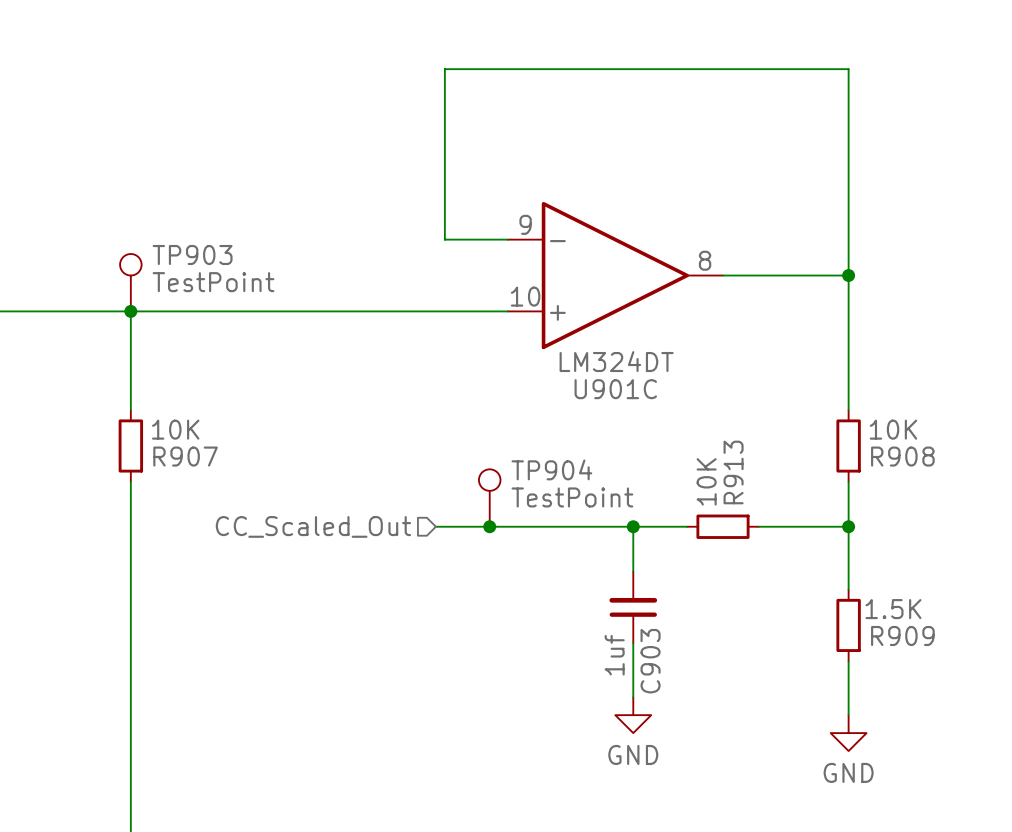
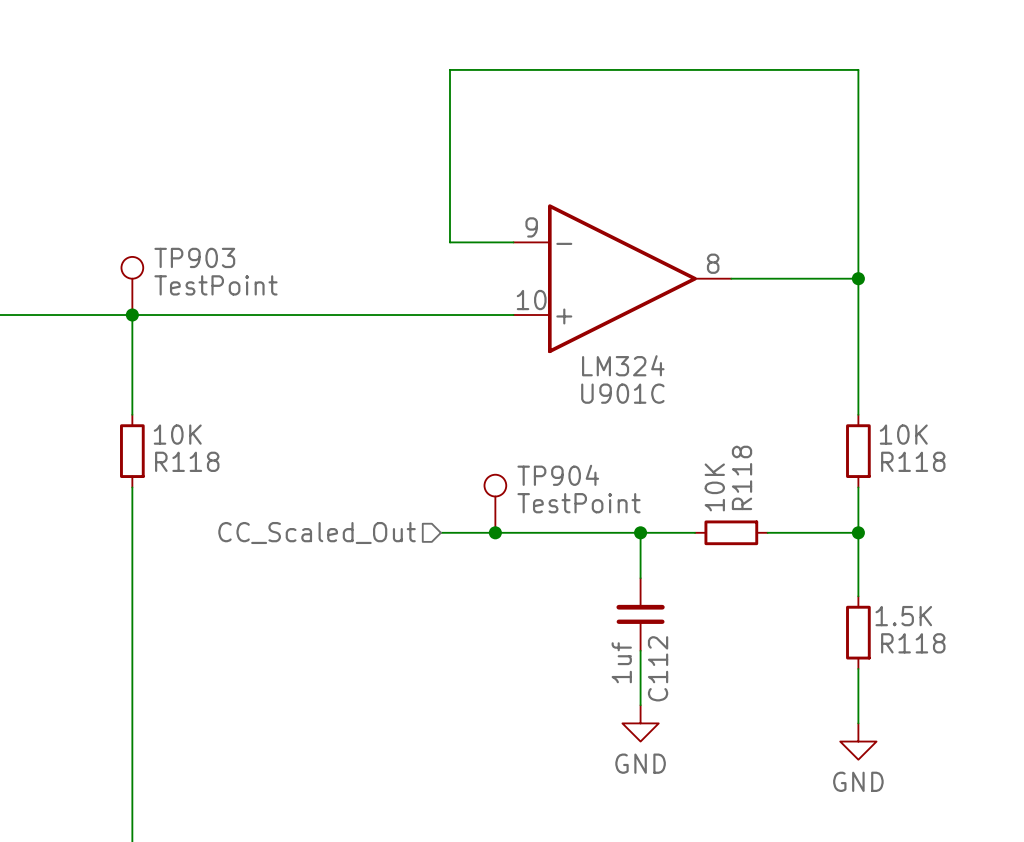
U901C value: LM324DT (616, 361) -> LM324 (623, 365)
R907 name: R907 (185, 456) -> R118 (187, 461)
R908 name: R908 (902, 456) -> R118 (913, 461)
R913 name: R913 (733, 472) -> R118 (742, 477)
R909 name: R909 (902, 636) -> R118 (913, 643)
C903 name: C903 (650, 661) -> C112 (658, 668)

